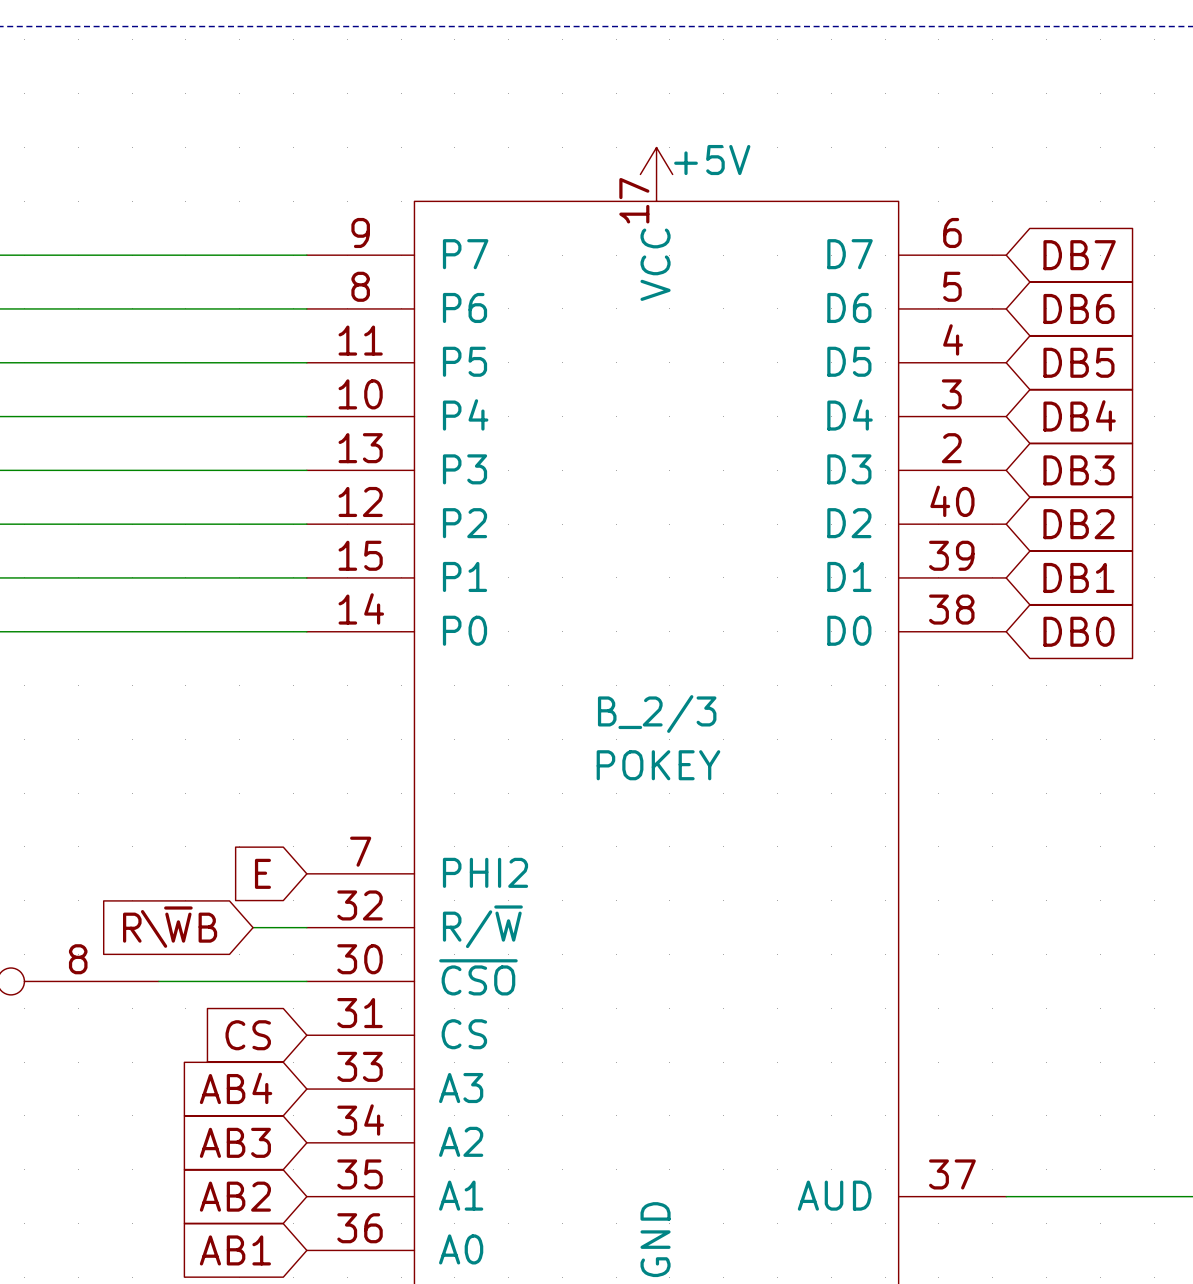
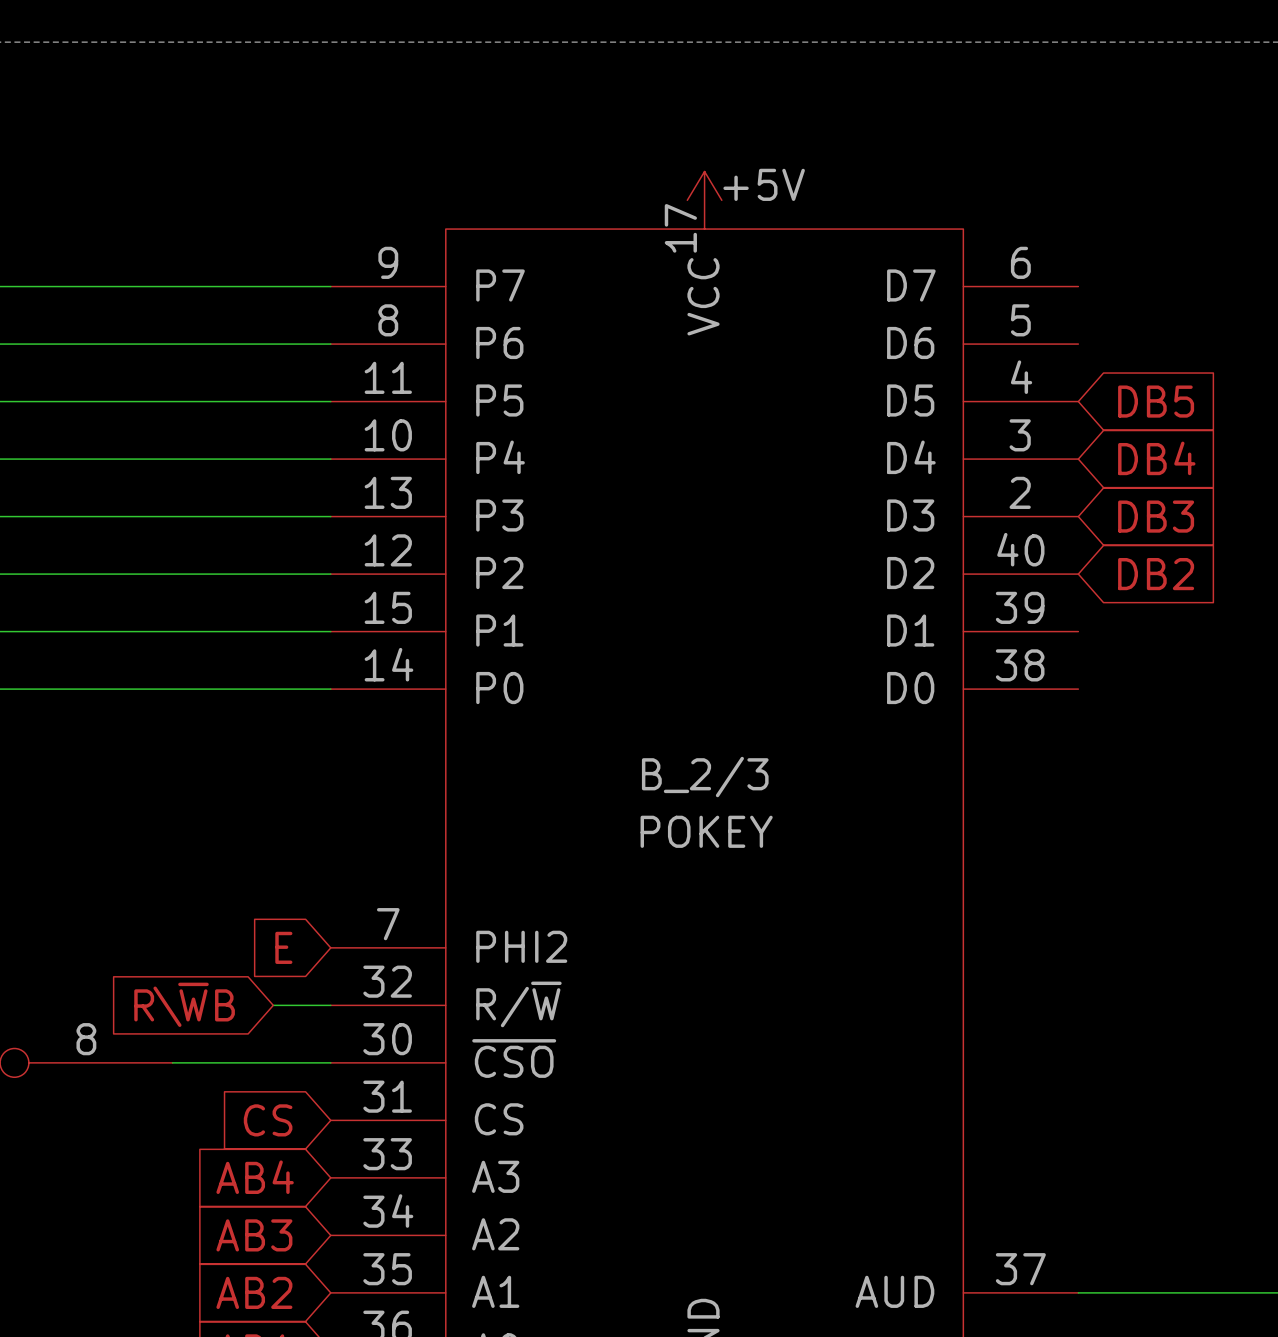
global label: DB7 (1079, 255) -> none
global label: DB6 (1078, 308) -> none
global label: DB1 (1078, 577) -> none
global label: DB0 (1078, 631) -> none

